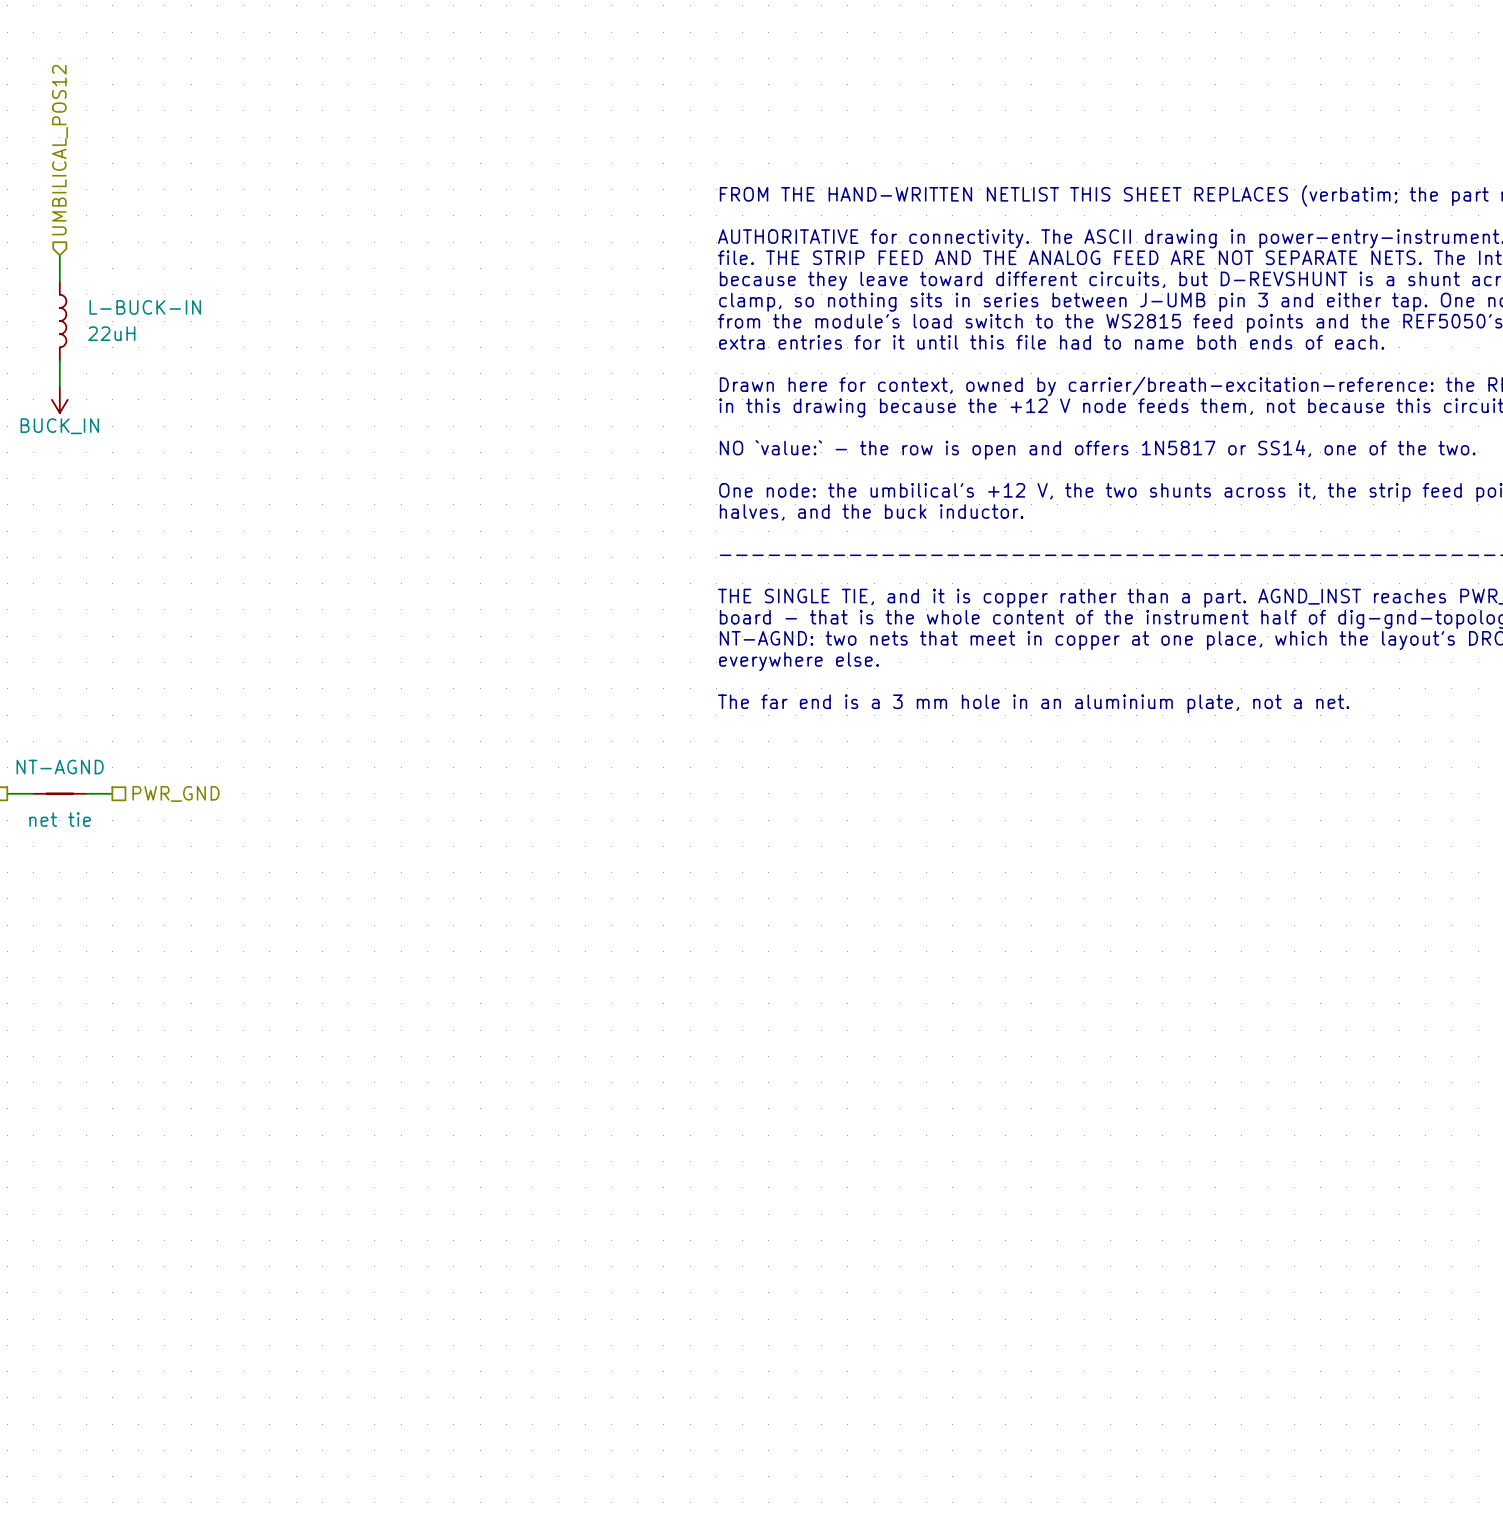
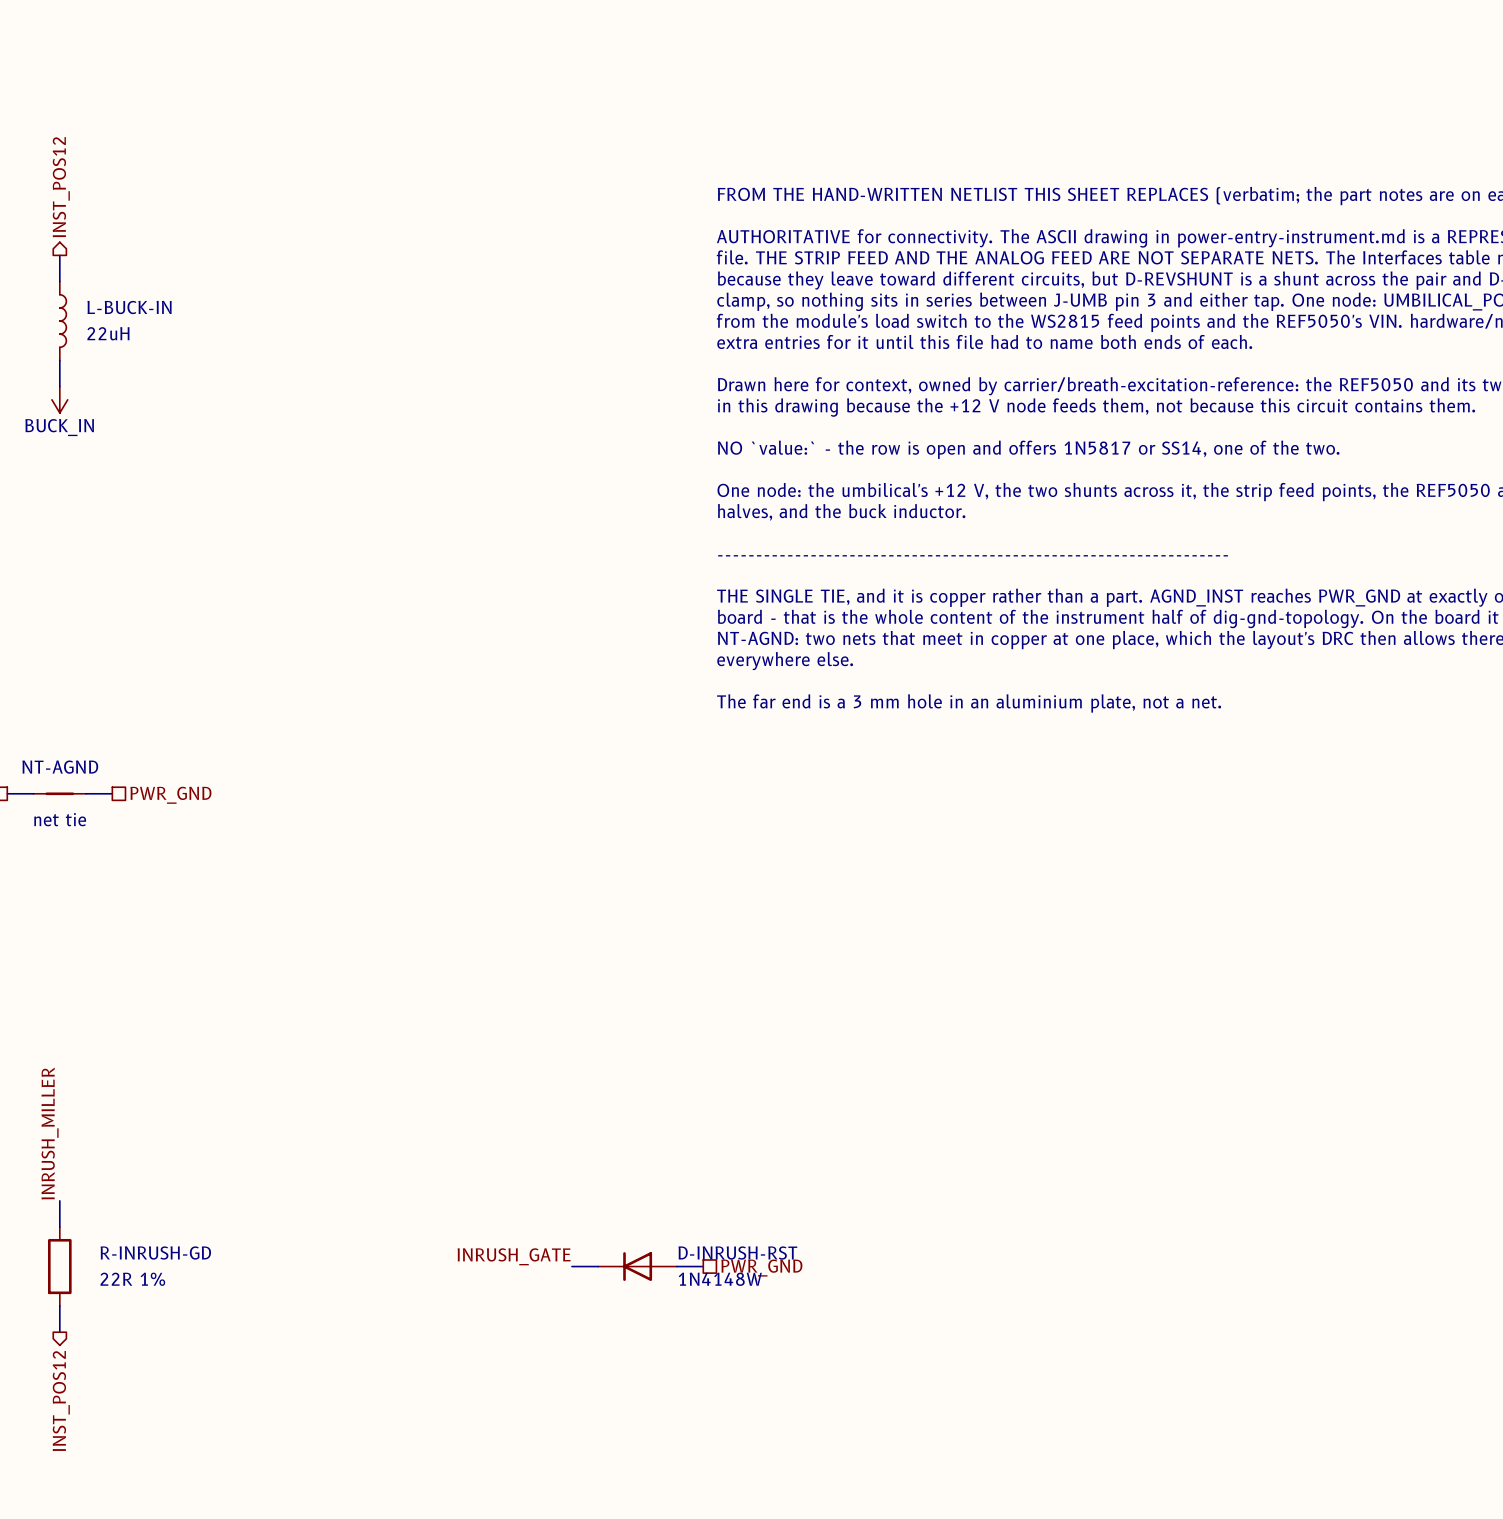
hierarchical label shape: input (59, 150) -> output (61, 187)
hierarchical label: UMBILICAL_POS12 (59, 150) -> INST_POS12 (61, 187)
label: none -> INRUSH_MILLER (50, 1133)
wire: none -> (59, 1200) (59, 1227)
label: none -> INRUSH_GATE (514, 1256)
R-INRUSH-GD: none -> 22R 1% (59, 1266)
wire: none -> (571, 1266) (598, 1266)
D-INRUSH-RST: none -> 1N4148W (637, 1266)
wire: none -> (677, 1266) (703, 1266)
hierarchical label: none -> PWR_GND (761, 1268)
wire: none -> (59, 1305) (59, 1332)
hierarchical label: none -> INST_POS12 (61, 1401)

